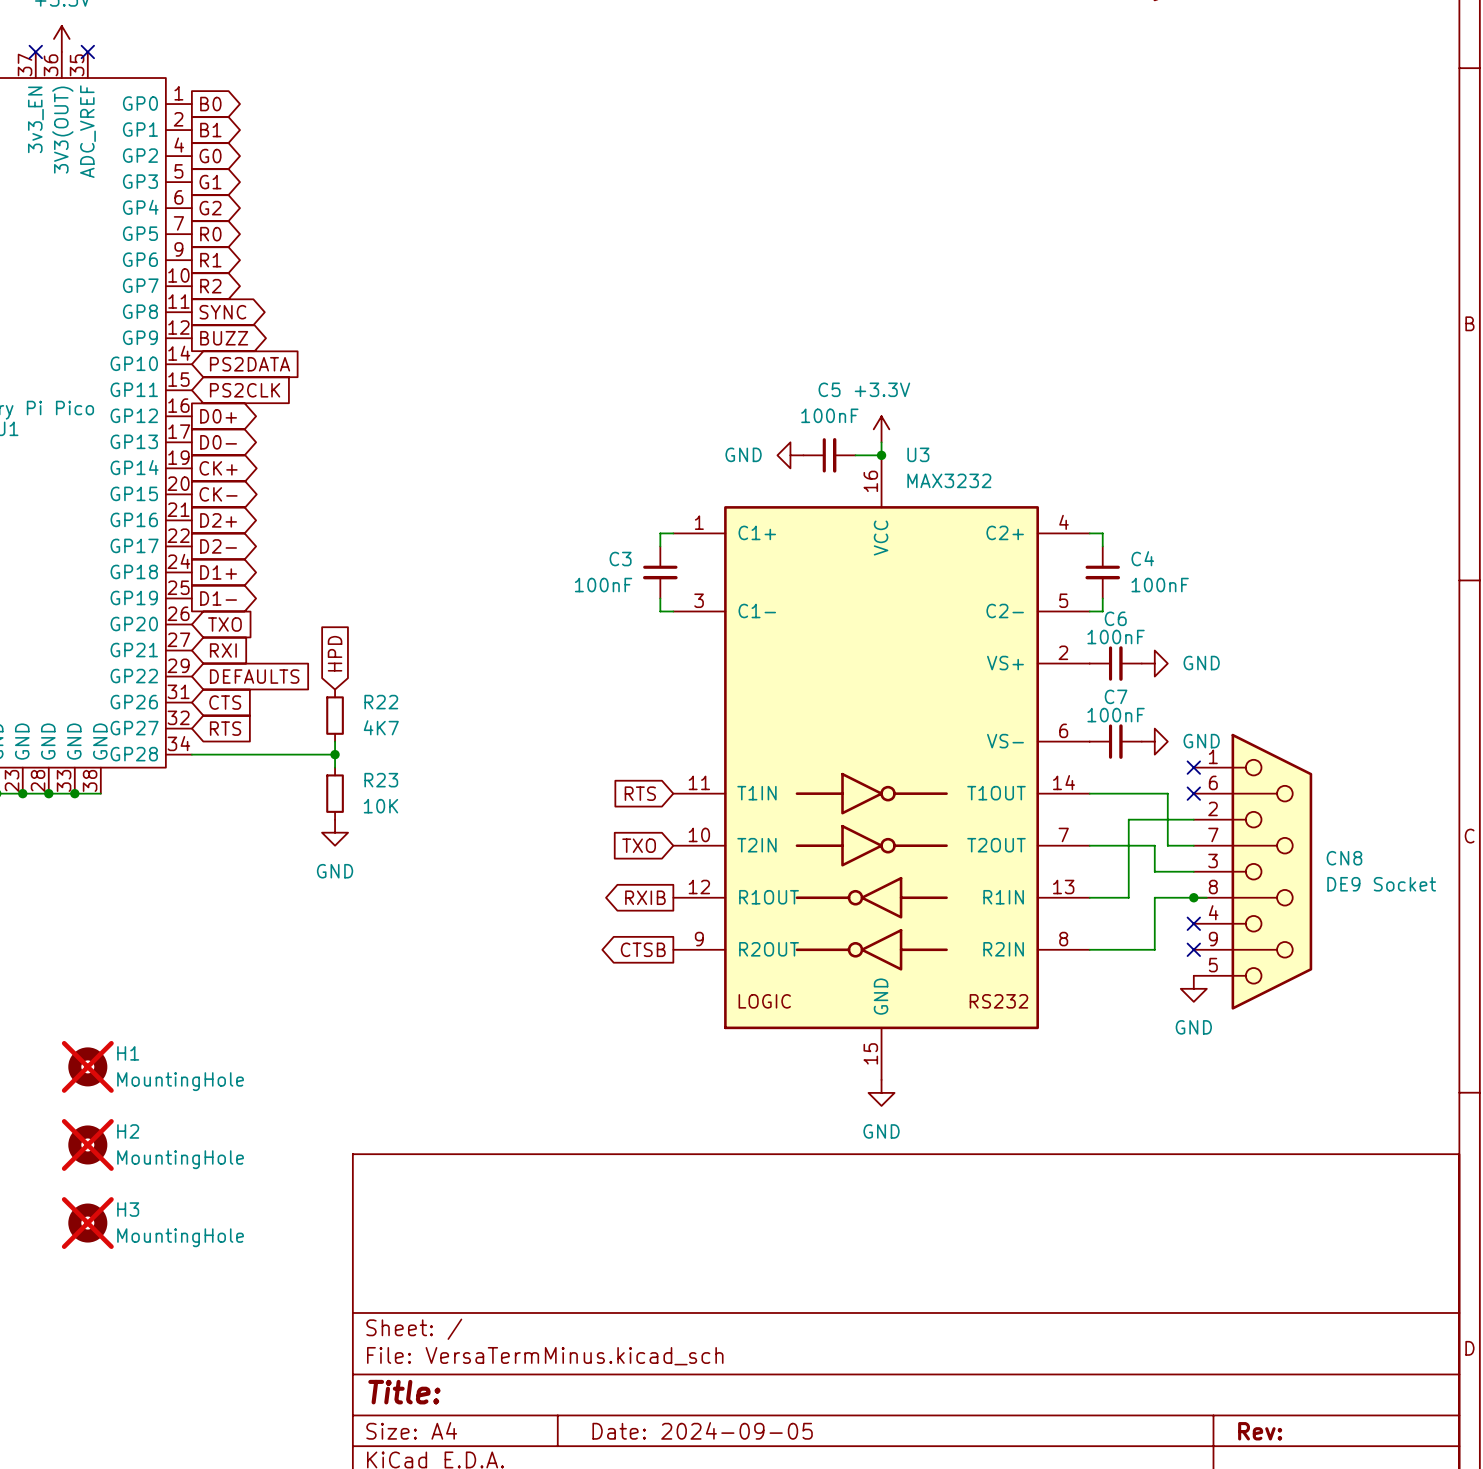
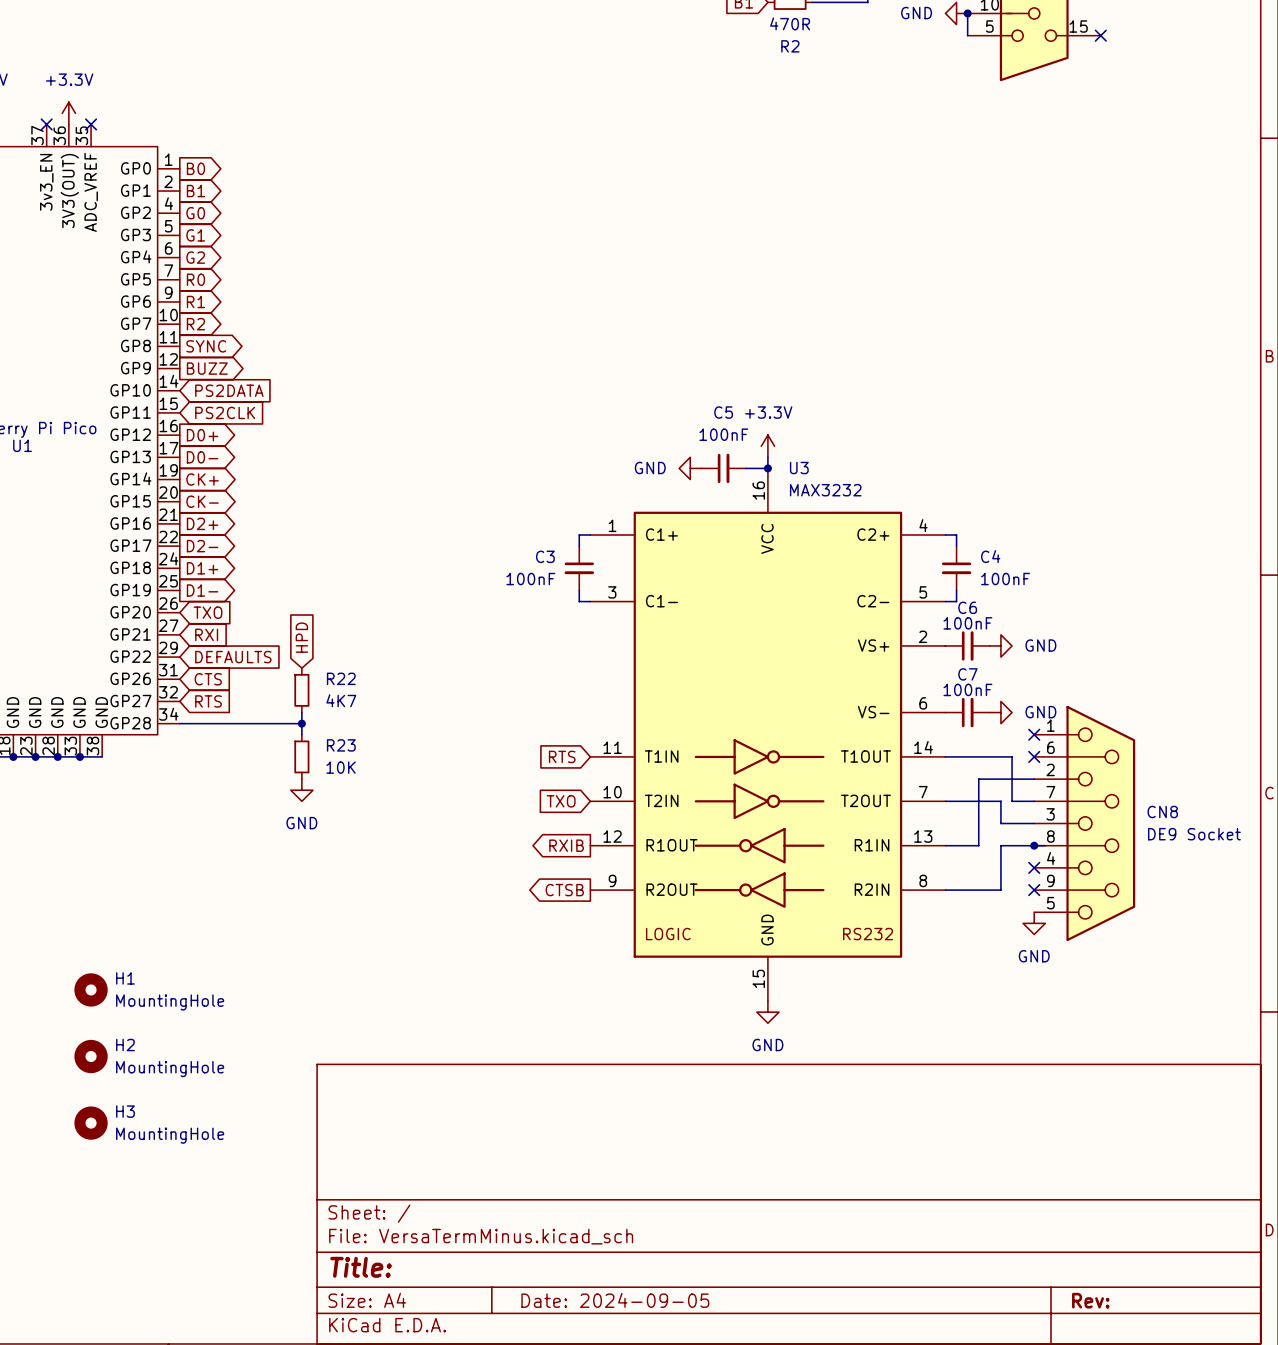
H1 do-not-place cross: (87, 1066) -> none
H2 do-not-place cross: (87, 1144) -> none
H3 do-not-place cross: (87, 1223) -> none

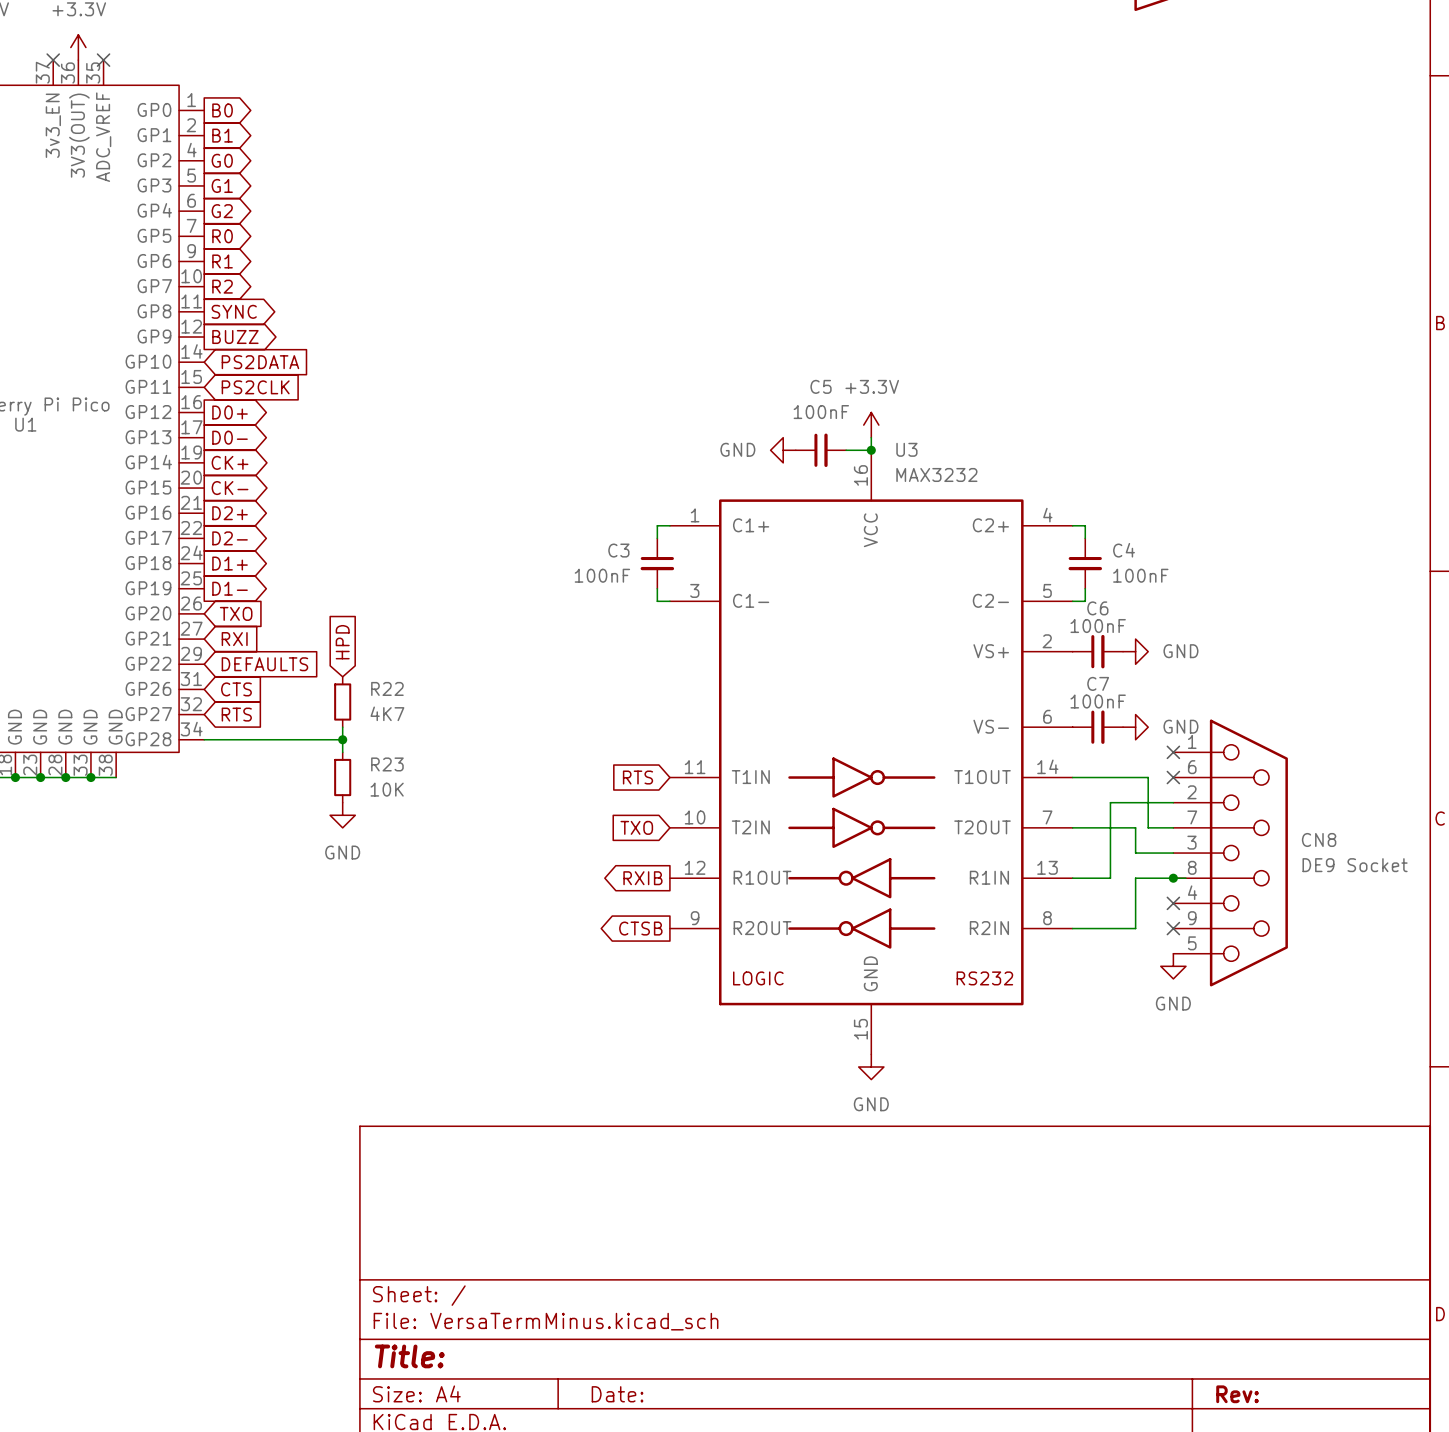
H1: MountingHole (91, 989) -> none
H2: MountingHole (91, 1056) -> none
H3: MountingHole (91, 1123) -> none
title block: Date: 2024-09-05 (615, 1300) -> Date: (617, 1394)

